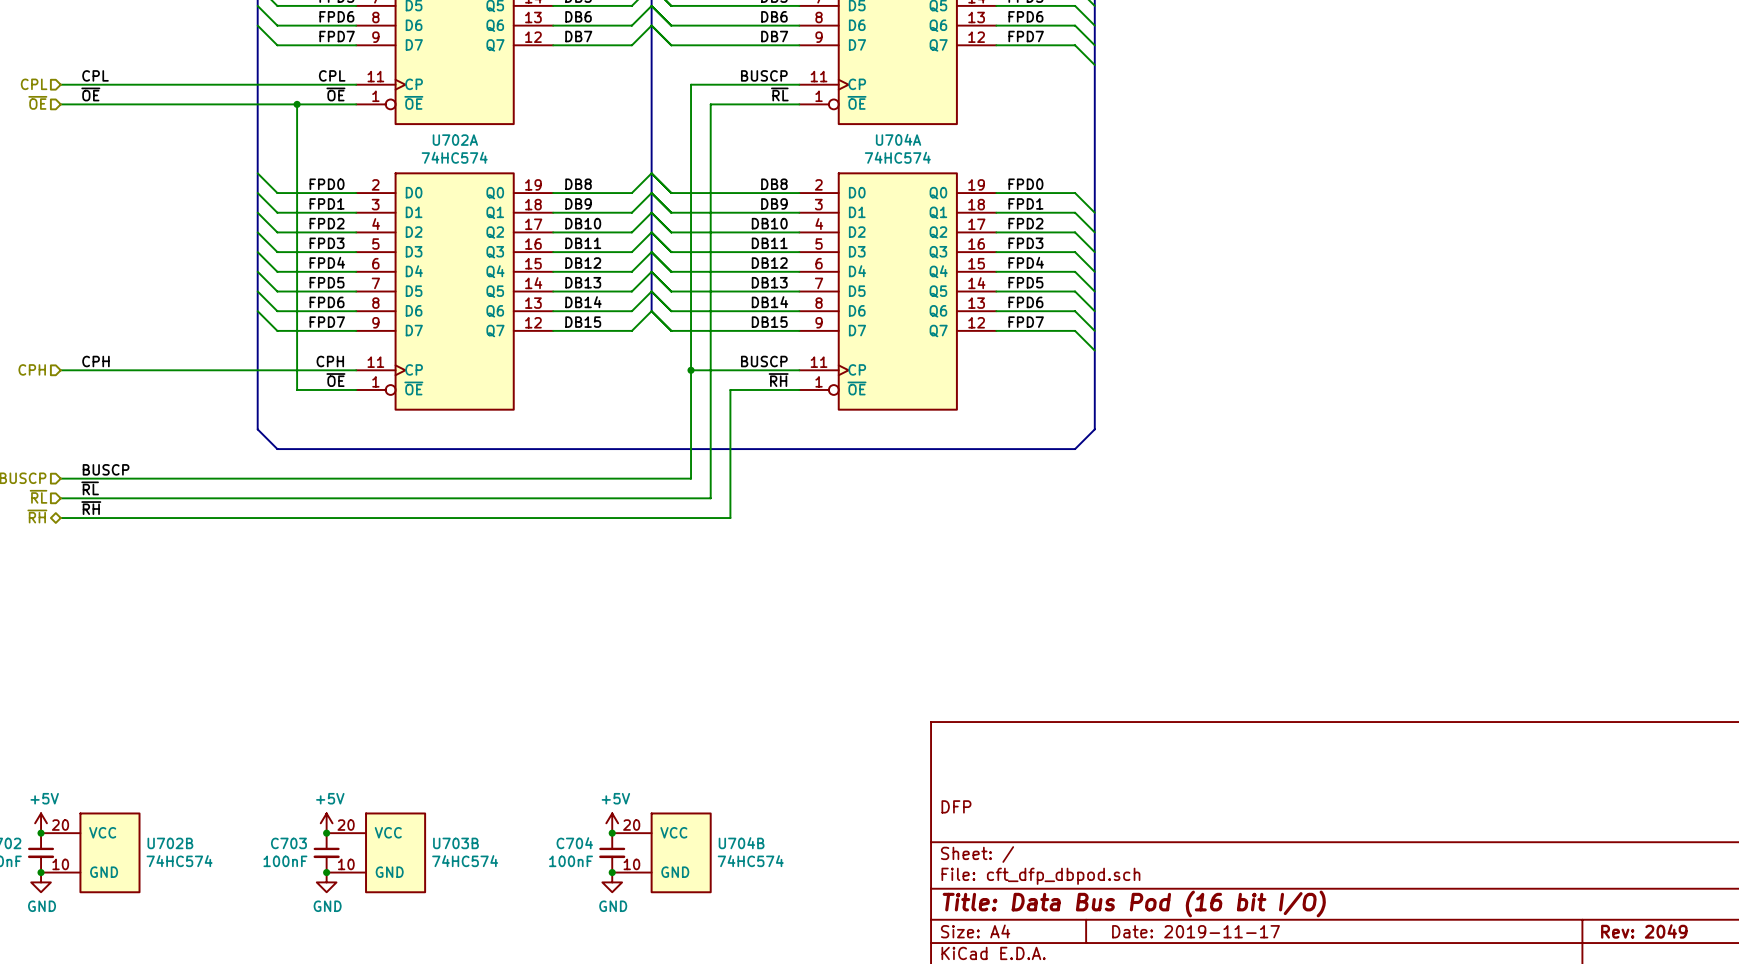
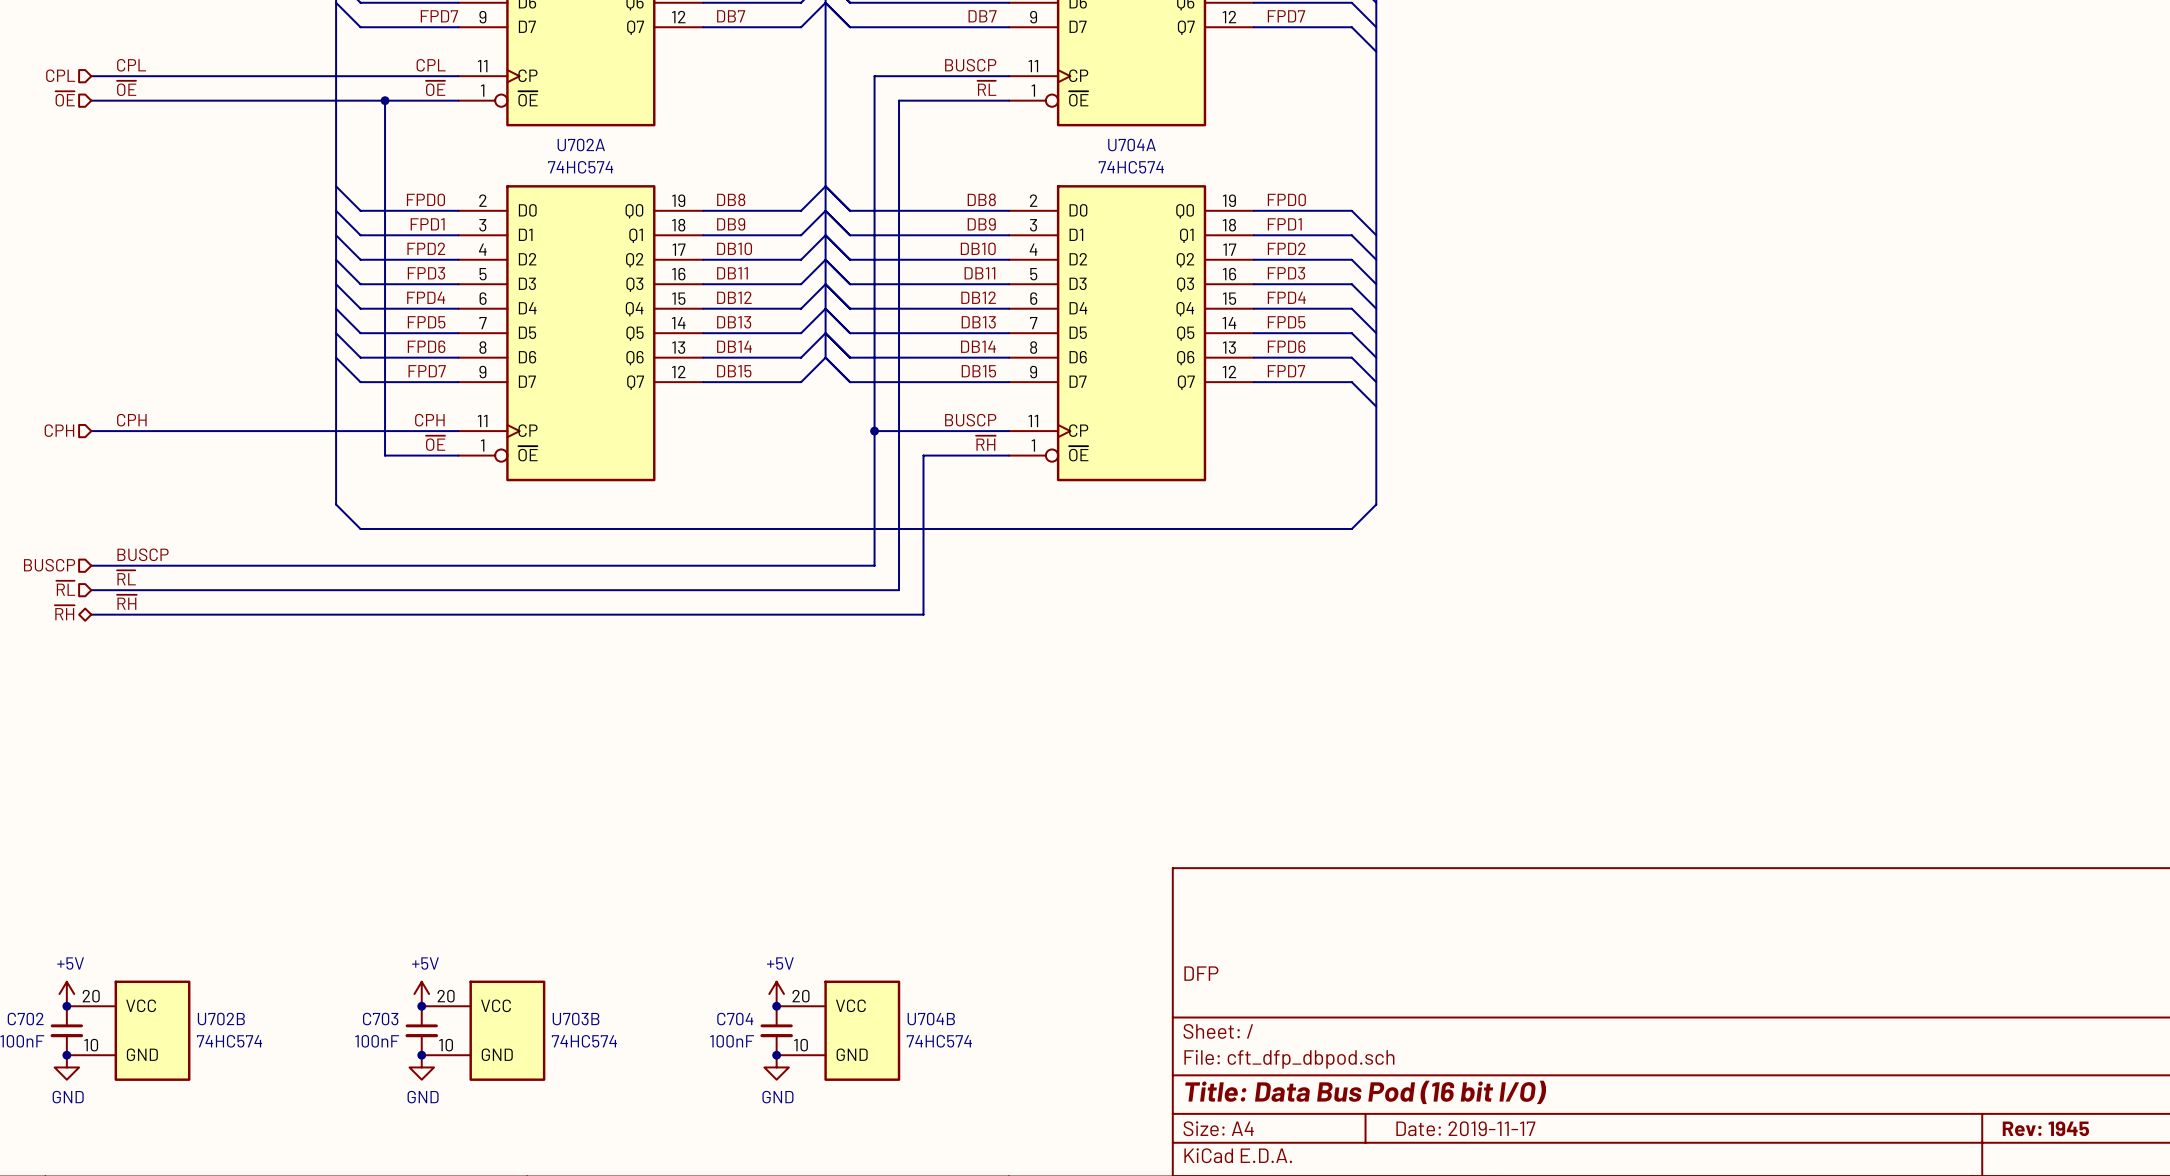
title block: Rev: 2049 (1644, 931) -> Rev: 1945 (2045, 1128)

